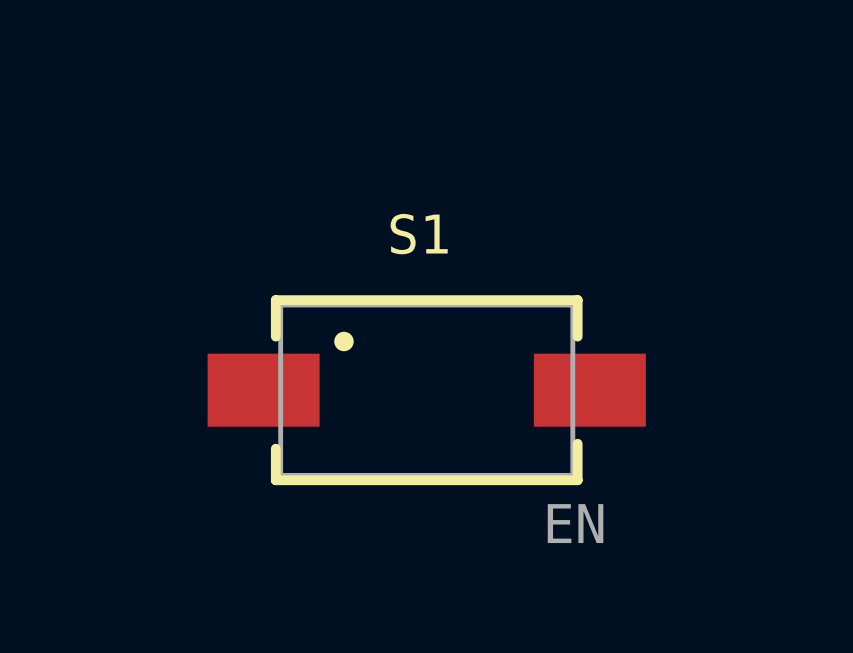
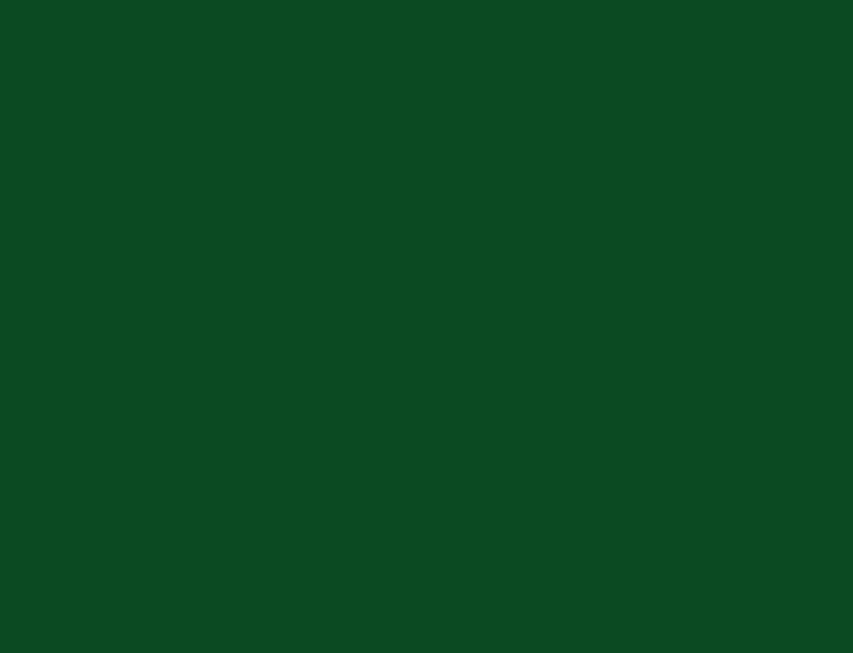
S1: EN (426, 390) -> none

